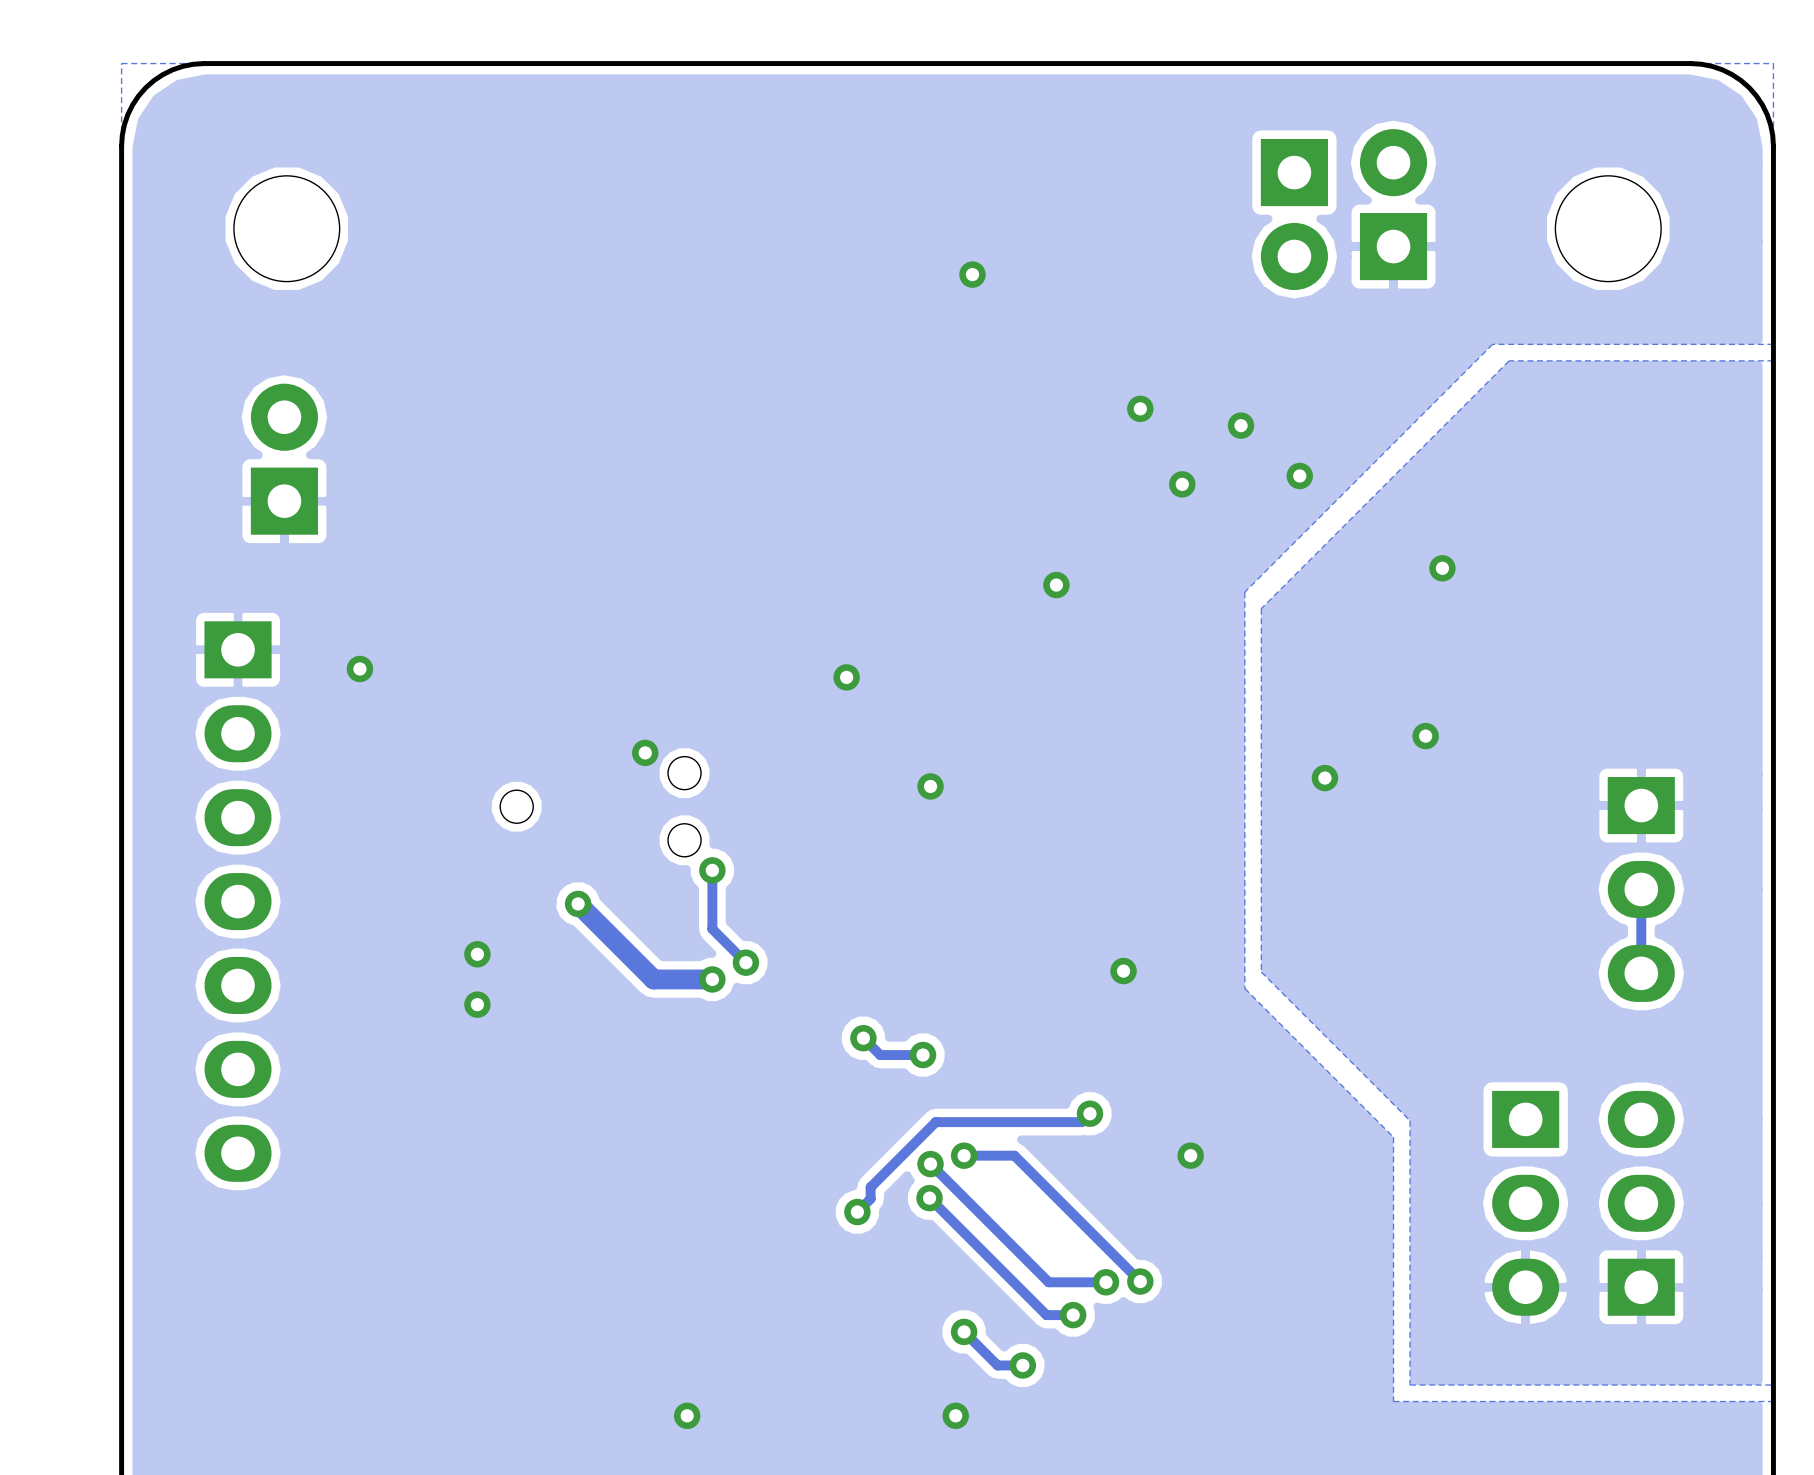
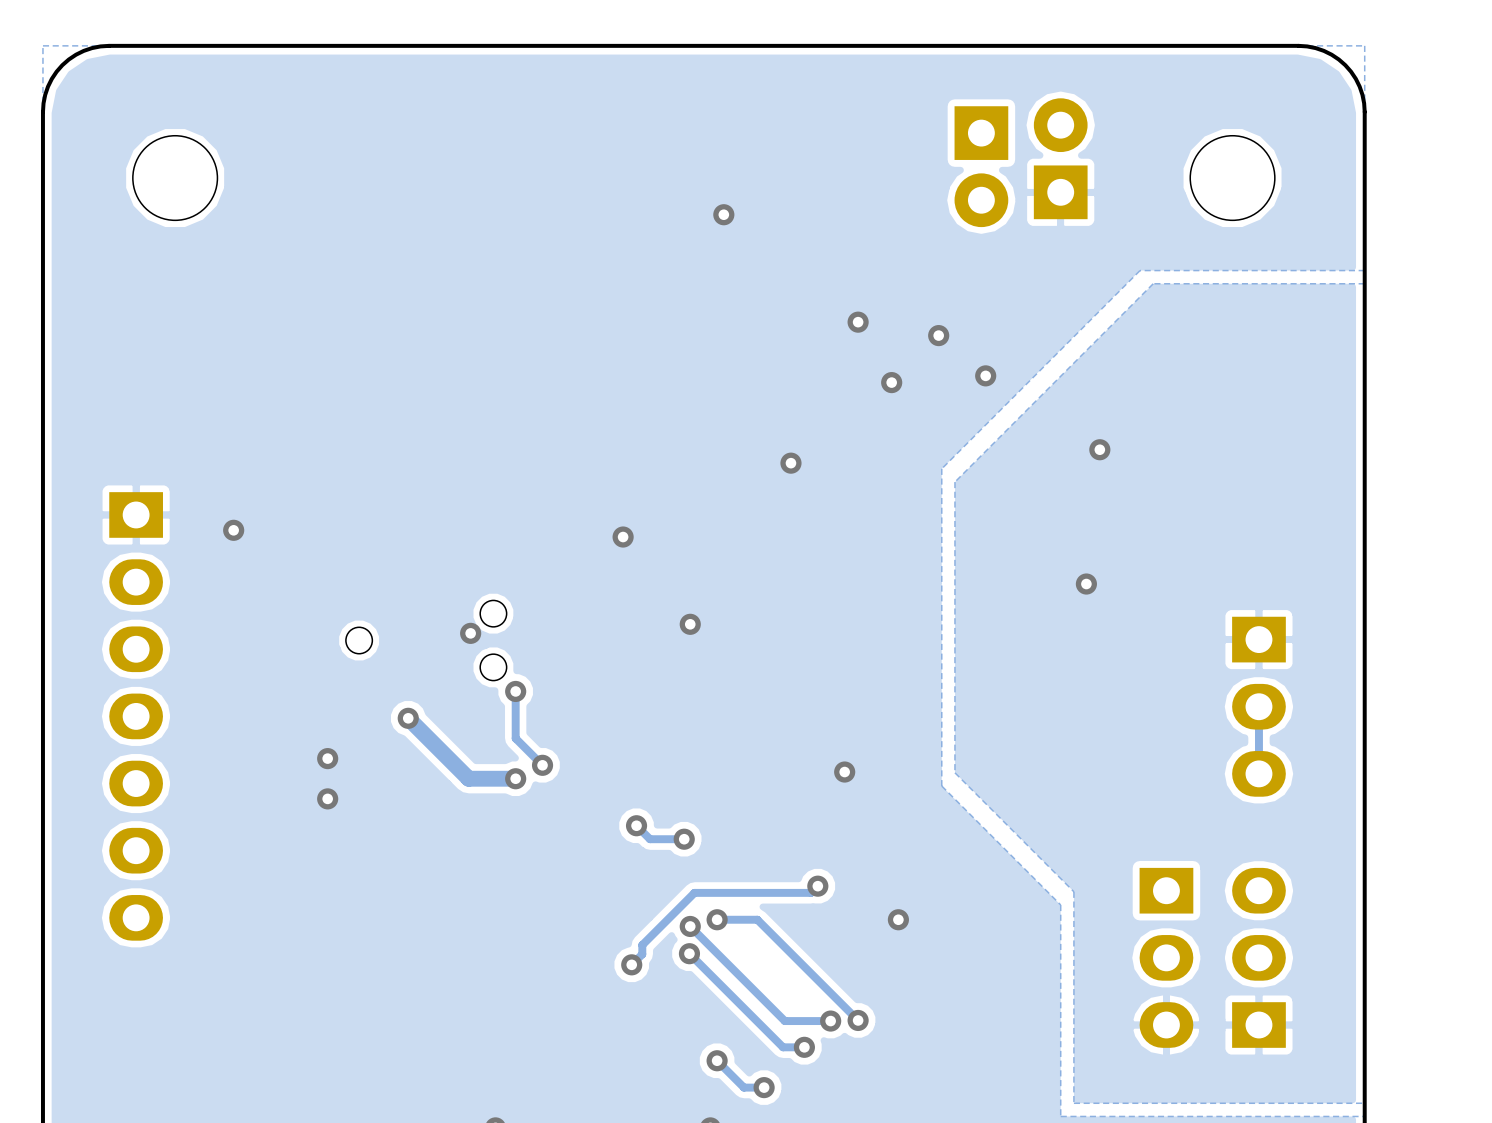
part: (284, 459) -> none
via position: (645, 752) -> (470, 633)
via: (1324, 778) -> none

